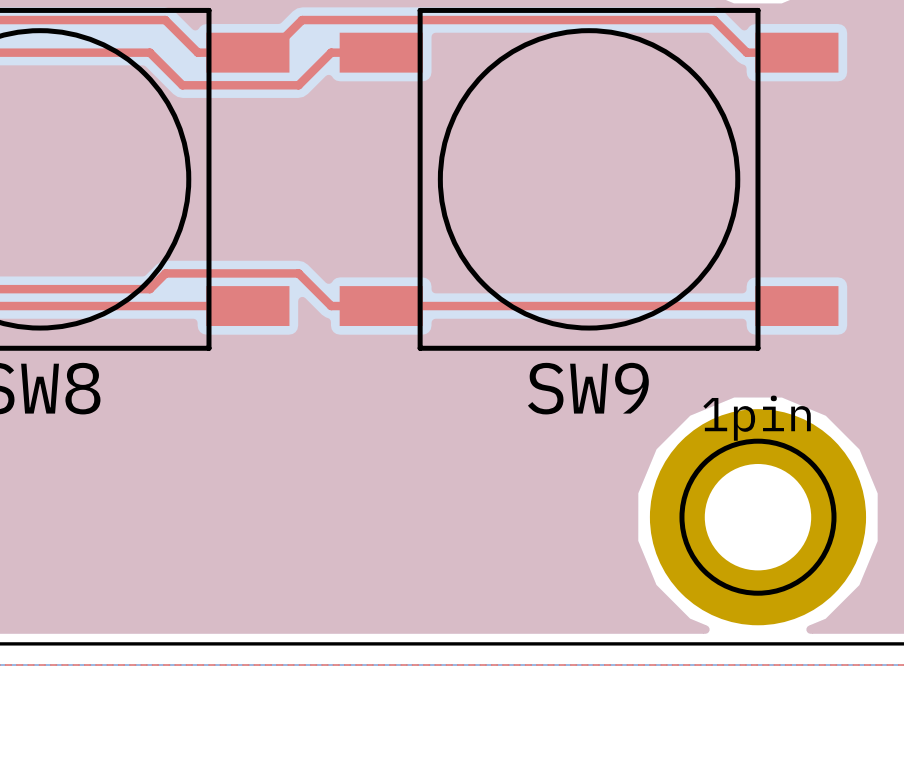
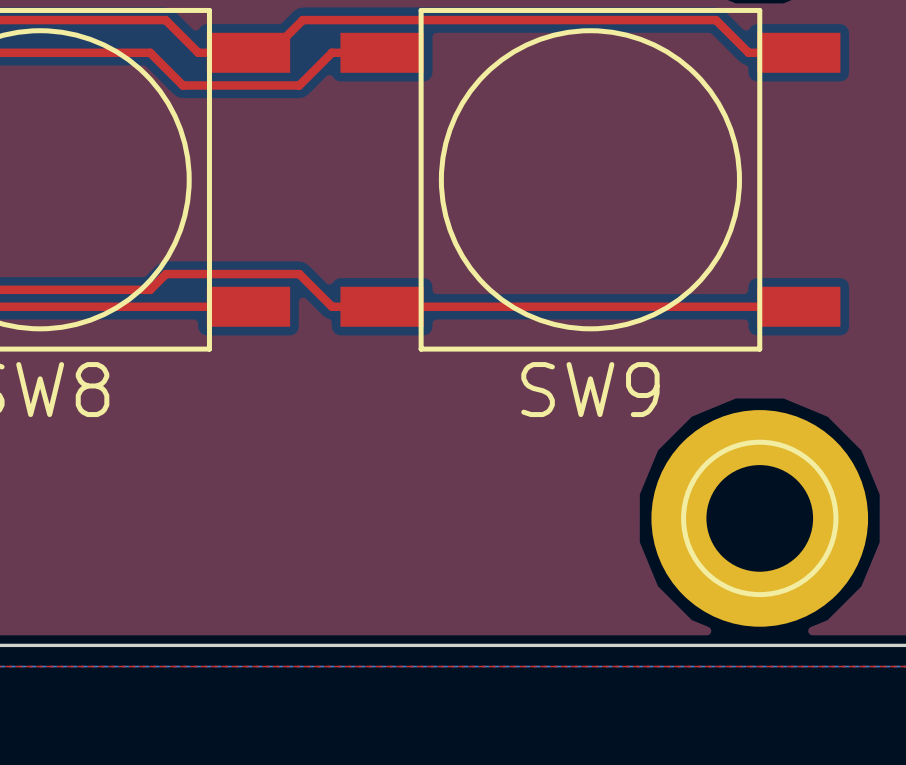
1pin name: 1pin (757, 418) -> none

